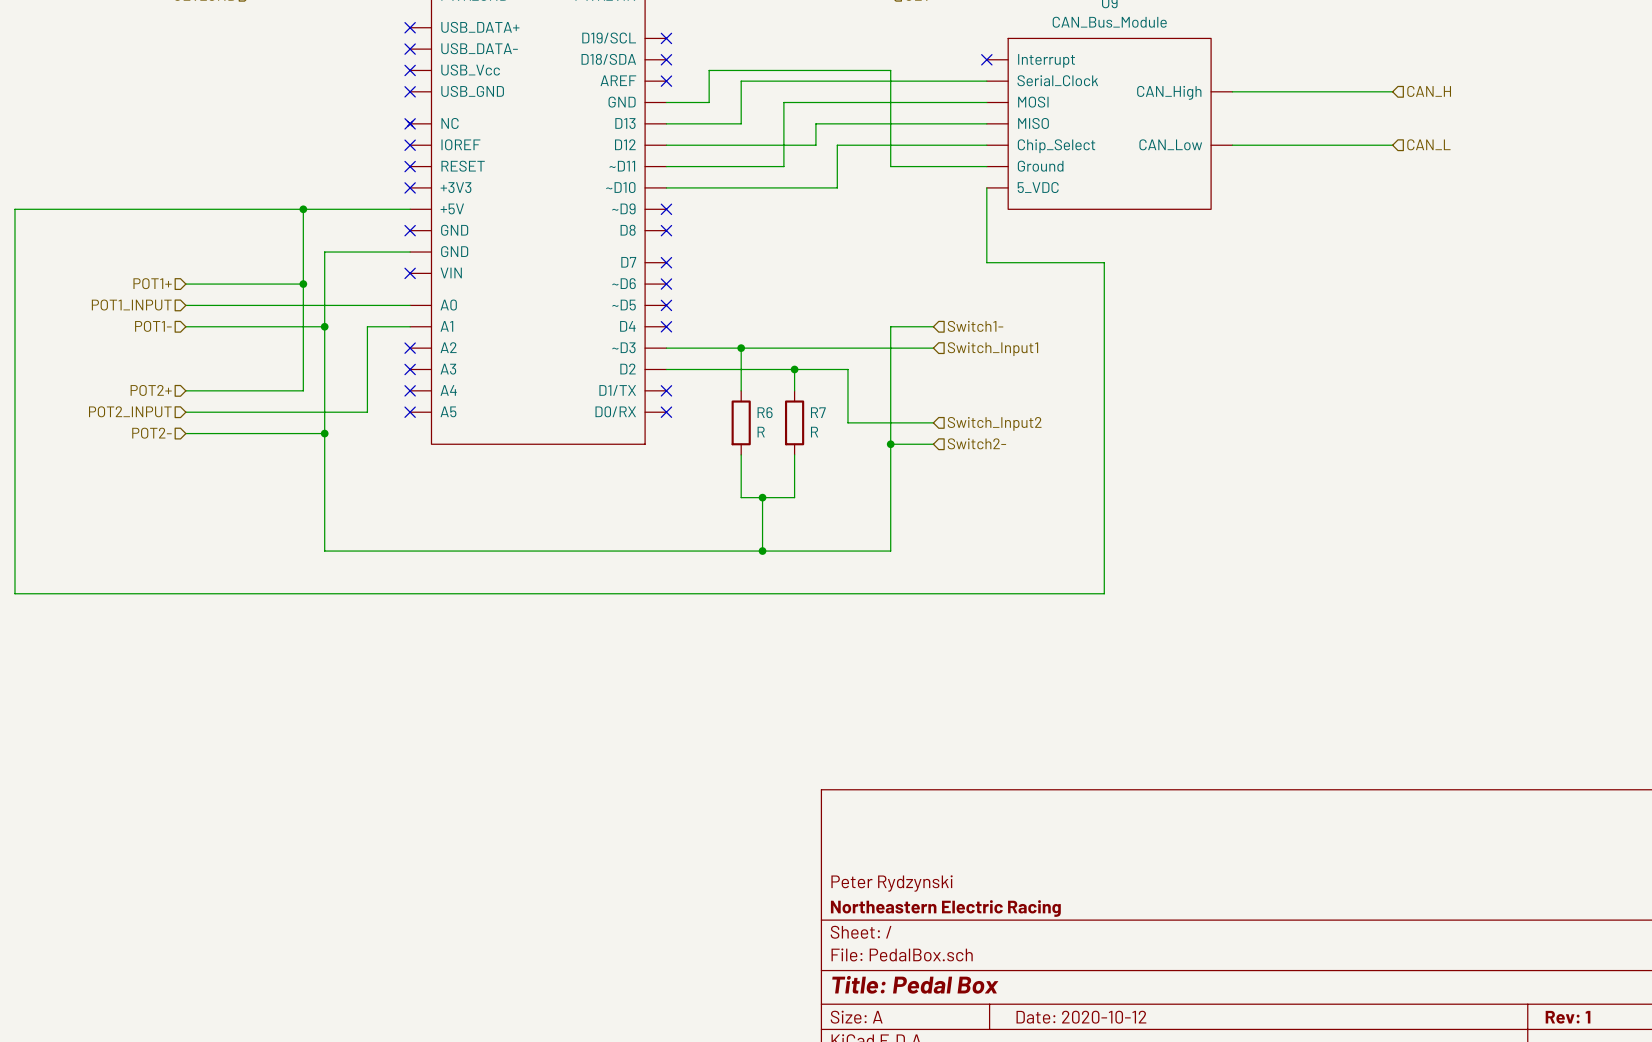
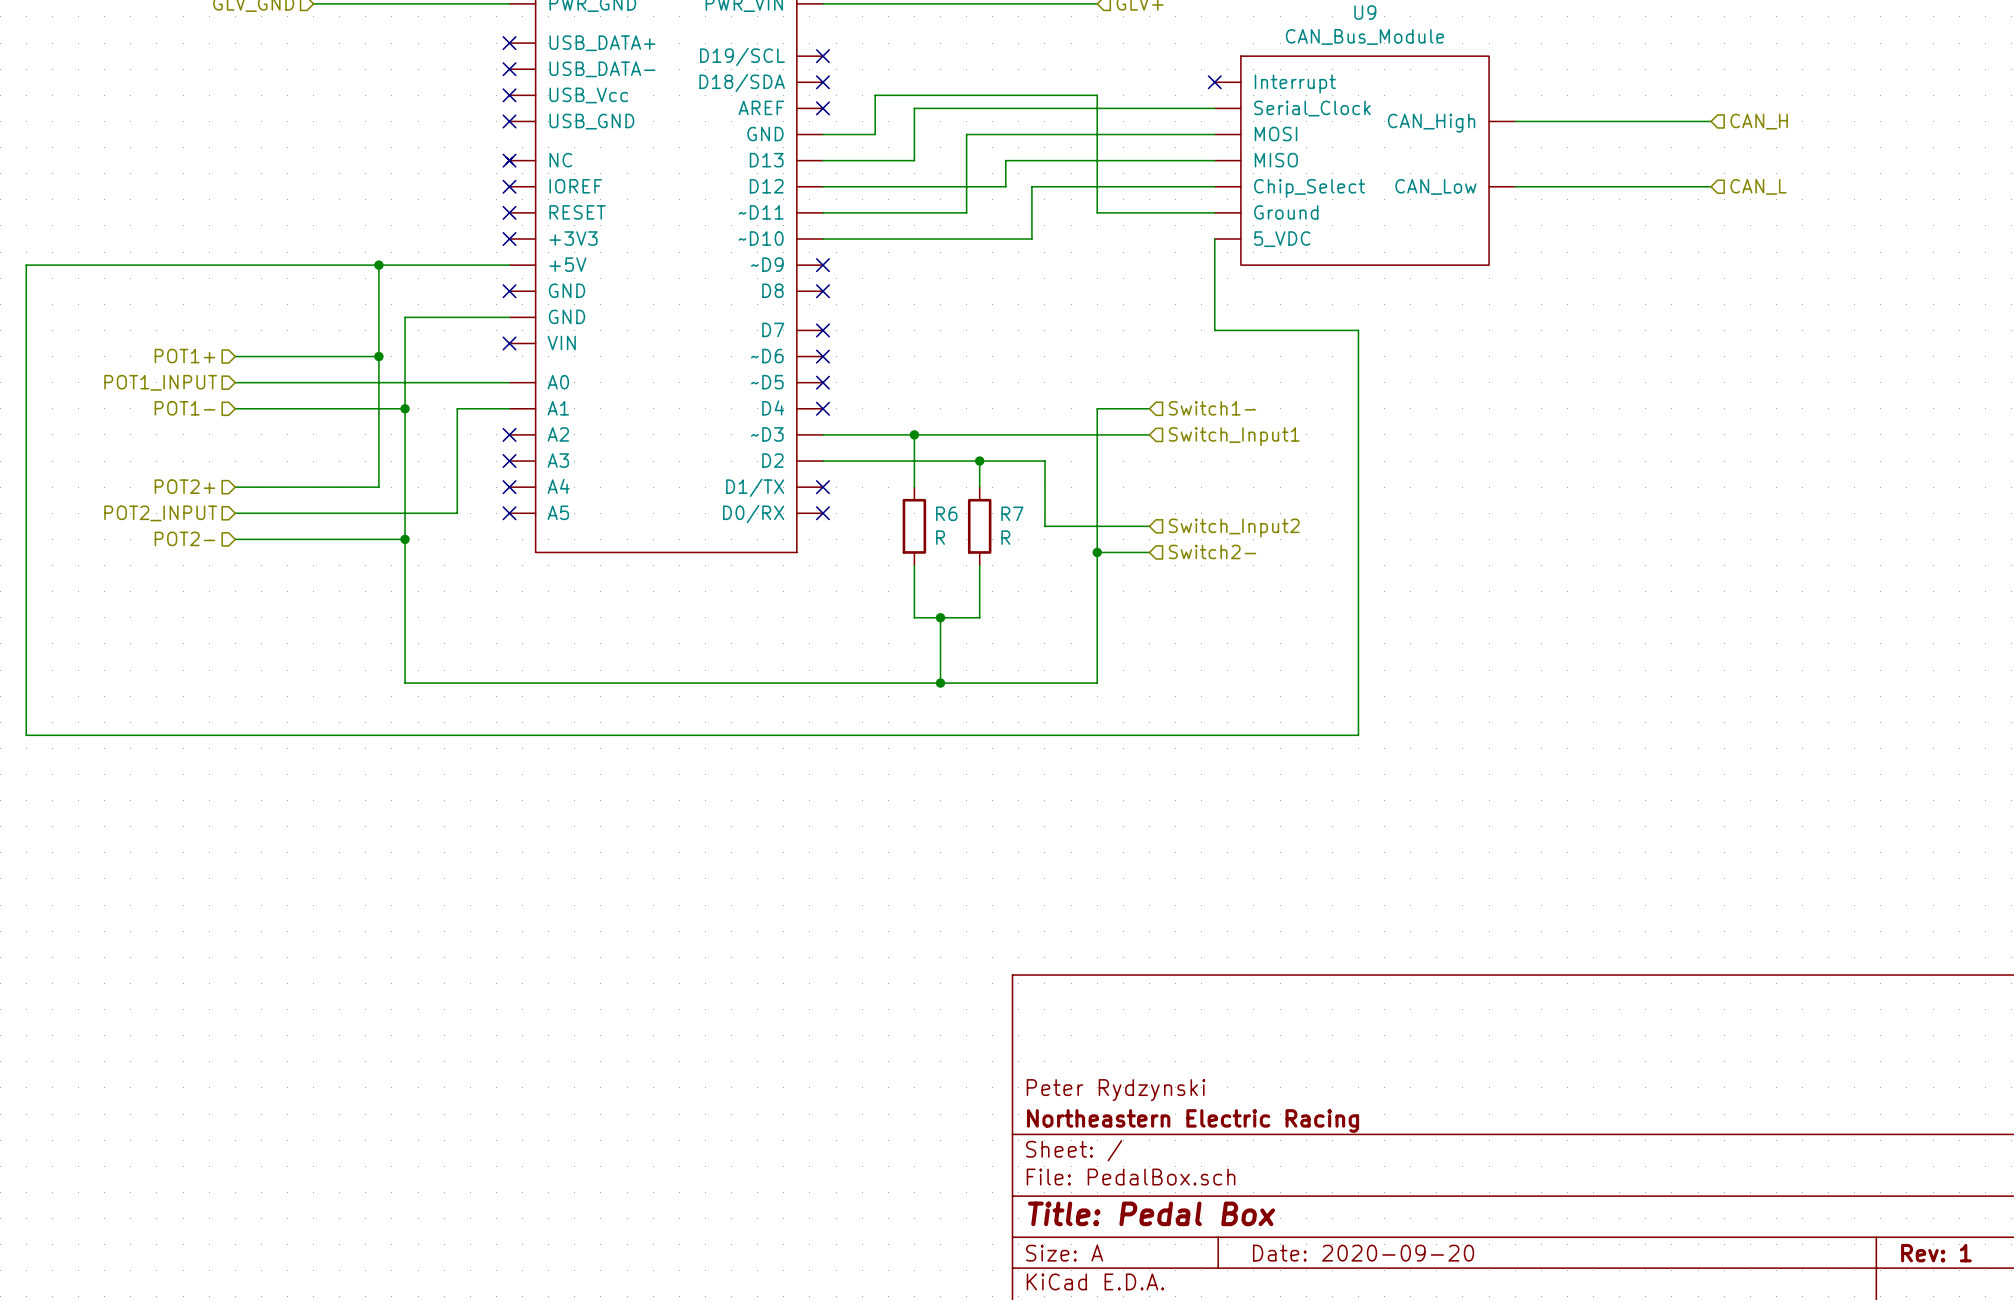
title block: Date: 2020-10-12 (1081, 1017) -> Date: 2020-09-20 (1363, 1253)

